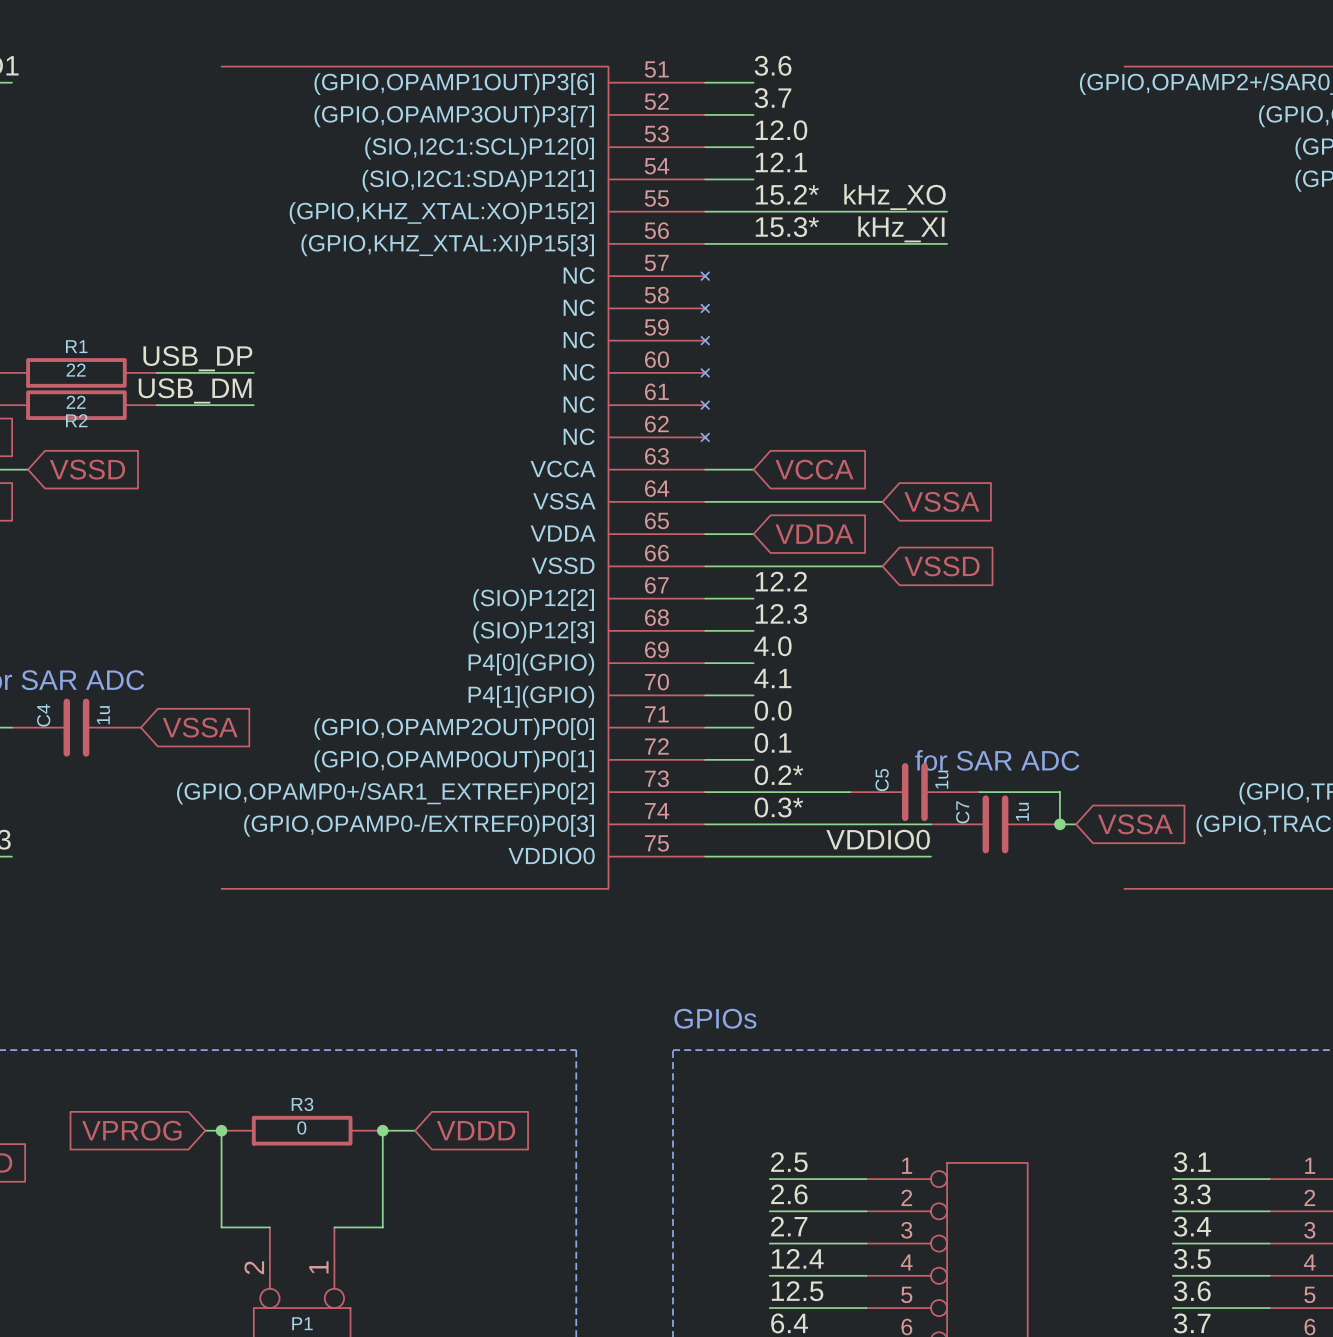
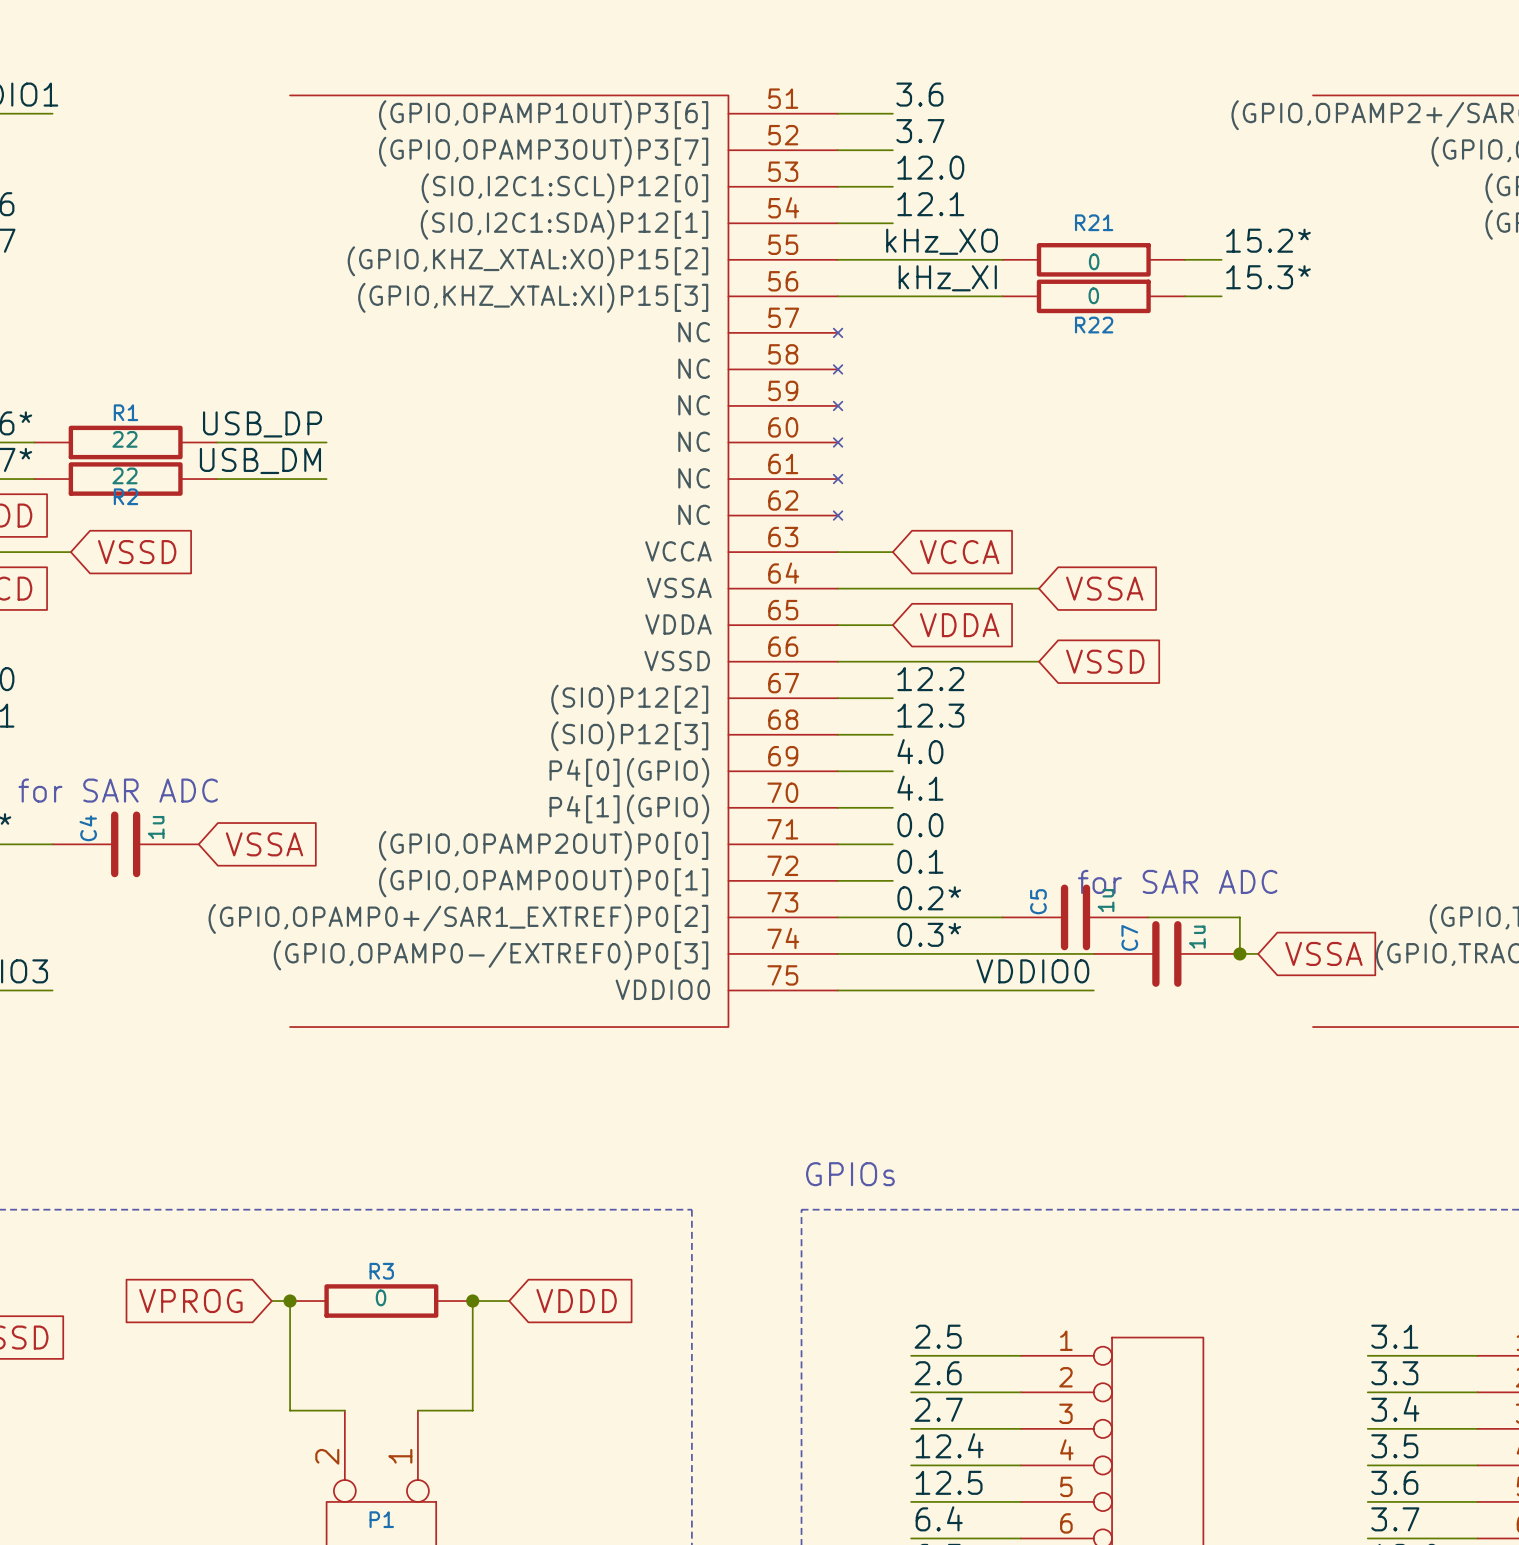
label position: 15.2* (787, 194) -> 15.2* (1268, 240)
label position: kHz_XO (895, 197) -> kHz_XO (942, 241)
wire: (850, 211) (947, 211) -> none
R21: none -> 0 (1093, 259)
wire: none -> (1185, 259) (1221, 259)
label position: 15.3* (787, 227) -> 15.3* (1268, 277)
label position: kHz_XI (901, 229) -> kHz_XI (947, 278)
wire: (850, 243) (947, 243) -> none
R22: none -> 0 (1093, 296)
wire: none -> (1185, 296) (1221, 296)

